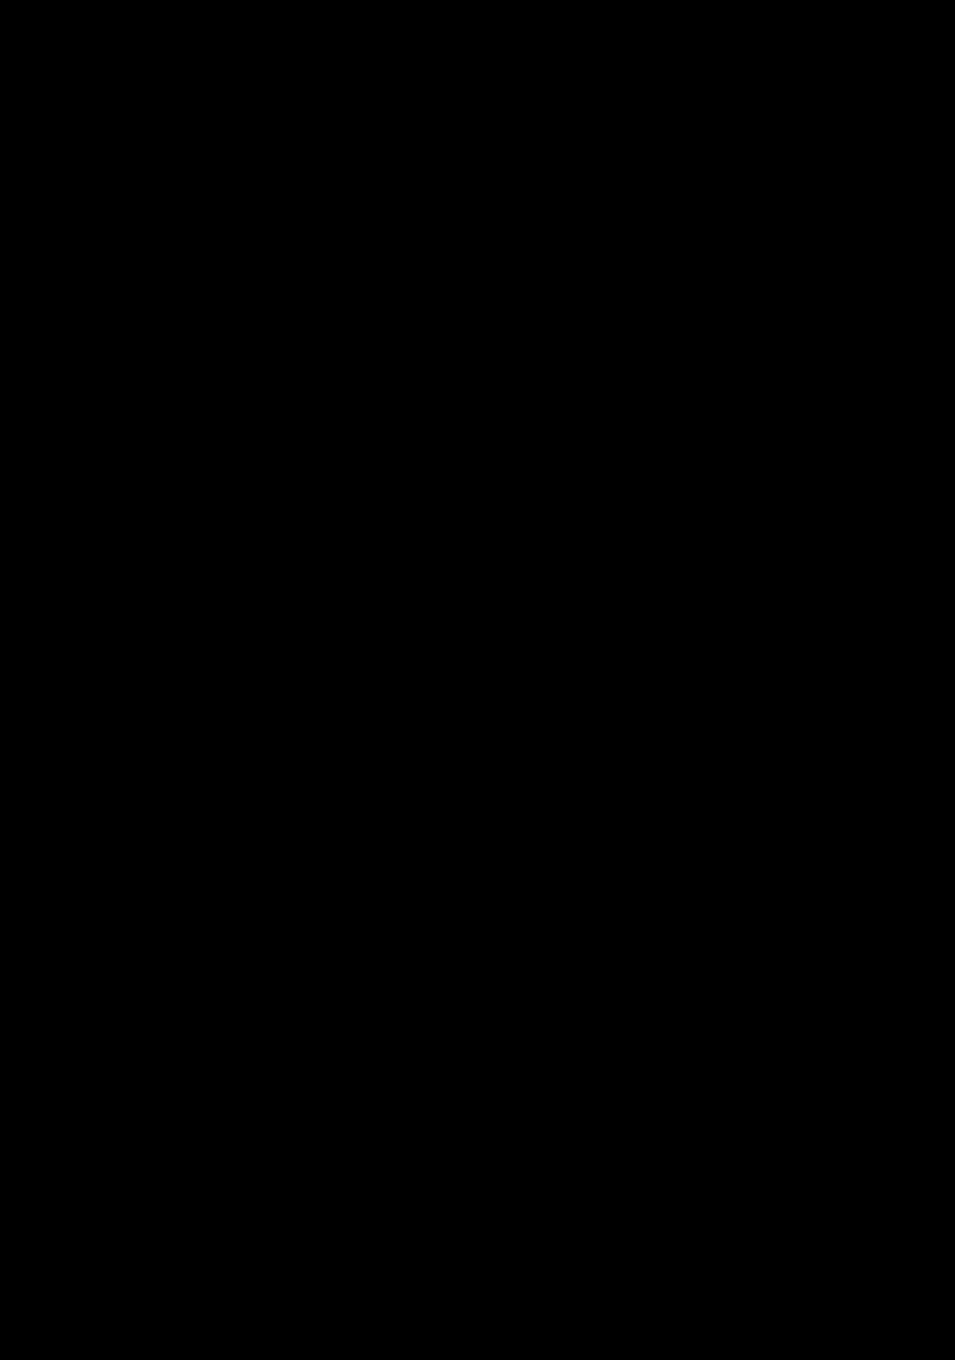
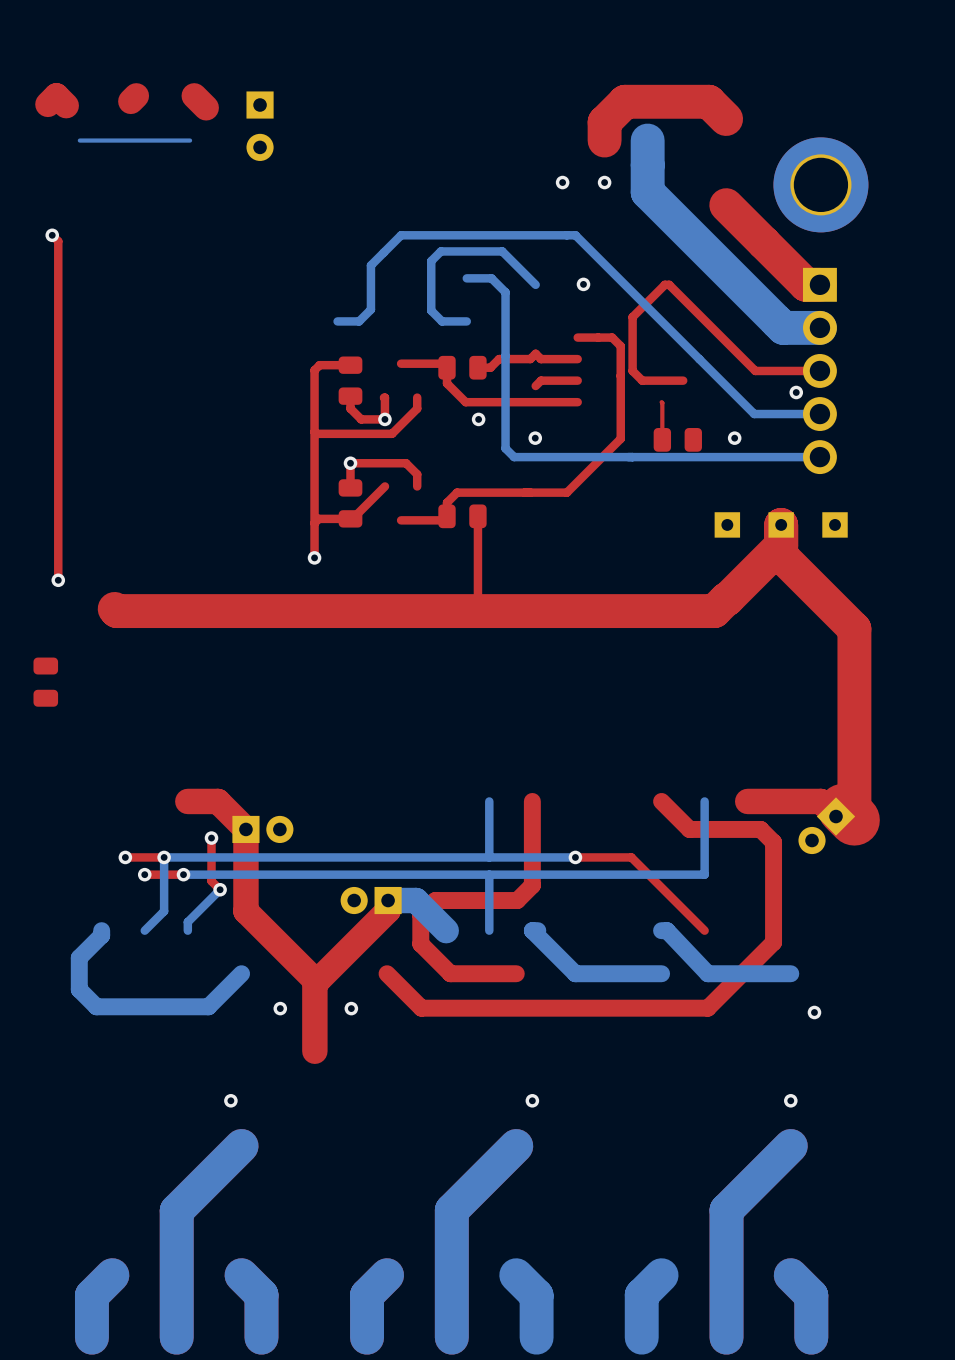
top track: none -> (136, 95) (130, 101)
top track: none -> (194, 95) (206, 107)
top track: none -> (47, 104) (56, 95) (66, 105)
top track: none -> (726, 119) (708, 101) (625, 101) (604, 122) (604, 140)
part: none -> (260, 126)
bottom track: none -> (190, 140) (79, 140)
bottom track: none -> (647, 140) (647, 192) (783, 327) (819, 327)
via: none -> (562, 182)
via: none -> (604, 182)
part: none -> (820, 184)
top track: none -> (726, 205) (805, 284) (819, 284)
top track: none -> (52, 235) (58, 241) (58, 580)
via: none -> (52, 235)
bottom track: none -> (466, 278) (491, 278) (505, 292) (505, 448) (514, 457) (819, 457)
bottom track: none -> (535, 284) (502, 251) (440, 251) (431, 261) (431, 310) (442, 321) (466, 321)
via: none -> (583, 284)
bottom track: none -> (337, 321) (359, 321) (370, 309) (370, 265) (401, 235) (575, 235) (754, 414) (819, 414)
top track: none -> (577, 337) (612, 337) (620, 346) (620, 438) (566, 492) (457, 492) (447, 502) (447, 516) (442, 520) (401, 520)
top track: none -> (577, 359) (541, 359) (535, 353) (530, 359) (499, 359) (490, 367) (477, 367)
top track: none -> (401, 363) (442, 363) (447, 367) (447, 383) (465, 402) (577, 402)
top track: none -> (350, 365) (319, 365) (314, 370) (314, 557)
part: none -> (462, 367)
top track: none -> (819, 370) (755, 370) (669, 284) (664, 284) (632, 317) (632, 370) (642, 380) (683, 380)
part: none -> (819, 370)
part: none -> (350, 380)
top track: none -> (577, 380) (541, 380) (535, 385)
via: none -> (796, 392)
top track: none -> (350, 396) (350, 408) (361, 419) (384, 419) (384, 397)
top track: none -> (417, 397) (417, 408) (392, 433)
top track: none -> (661, 402) (662, 439)
via: none -> (384, 419)
via: none -> (478, 419)
top track: none -> (314, 431) (316, 433) (392, 433)
via: none -> (535, 438)
via: none -> (734, 438)
part: none -> (677, 439)
via: none -> (350, 463)
top track: none -> (384, 486) (352, 518) (318, 518) (314, 523)
top track: none -> (417, 486) (417, 474) (406, 463) (350, 463) (350, 487)
part: none -> (350, 503)
part: none -> (462, 516)
top track: none -> (477, 516) (477, 595)
part: none -> (727, 524)
top track: none -> (781, 524) (781, 555) (854, 628) (854, 820) (843, 809)
part: none -> (781, 524)
part: none -> (835, 524)
top track: none -> (781, 545) (714, 611) (116, 611) (114, 608)
via: none -> (314, 557)
via: none -> (58, 580)
part: none -> (45, 682)
top track: none -> (187, 801) (217, 801) (245, 829) (245, 911) (314, 980)
bottom track: none -> (489, 801) (489, 857)
top track: none -> (532, 801) (532, 885) (517, 900) (435, 900) (420, 915) (420, 943) (450, 973) (516, 973)
top track: none -> (661, 801) (689, 829) (760, 829) (773, 842) (773, 942) (707, 1008) (421, 1008) (387, 973)
bottom track: none -> (704, 801) (704, 874) (183, 874)
top track: none -> (747, 801) (820, 801) (836, 816)
part: none -> (826, 825)
part: none -> (262, 829)
top track: none -> (211, 838) (211, 881) (220, 889)
via: none -> (211, 838)
via: none -> (125, 857)
top track: none -> (164, 857) (125, 857)
via: none -> (164, 857)
bottom track: none -> (575, 857) (164, 857) (164, 911) (144, 930)
top track: none -> (575, 857) (631, 857) (704, 930)
via: none -> (575, 857)
via: none -> (144, 874)
top track: none -> (183, 874) (144, 874)
via: none -> (183, 874)
bottom track: none -> (489, 874) (489, 930)
bottom track: none -> (220, 889) (187, 922) (187, 930)
via: none -> (220, 889)
part: none -> (371, 900)
bottom track: none -> (388, 900) (416, 900) (446, 930)
top track: none -> (388, 900) (388, 910) (318, 980) (314, 980)
bottom track: none -> (101, 930) (101, 935) (79, 957) (79, 989) (96, 1006) (208, 1006) (241, 973)
bottom track: none -> (537, 930) (532, 930) (575, 973) (661, 973)
bottom track: none -> (661, 930) (667, 930) (707, 973) (790, 973)
top track: none -> (314, 980) (314, 1051)
via: none -> (280, 1008)
via: none -> (351, 1008)
via: none -> (814, 1012)
via: none -> (230, 1100)
via: none -> (532, 1100)
via: none -> (790, 1100)
bottom track: none -> (241, 1146) (176, 1210) (176, 1337)
bottom track: none -> (516, 1146) (451, 1210) (451, 1337)
bottom track: none -> (790, 1146) (726, 1210) (726, 1337)
bottom track: none -> (112, 1275) (91, 1295) (91, 1337)
bottom track: none -> (241, 1275) (261, 1295) (261, 1337)
bottom track: none -> (387, 1275) (367, 1295) (367, 1337)
bottom track: none -> (516, 1275) (536, 1295) (536, 1337)
bottom track: none -> (661, 1275) (641, 1295) (641, 1337)
bottom track: none -> (790, 1275) (811, 1295) (811, 1337)

